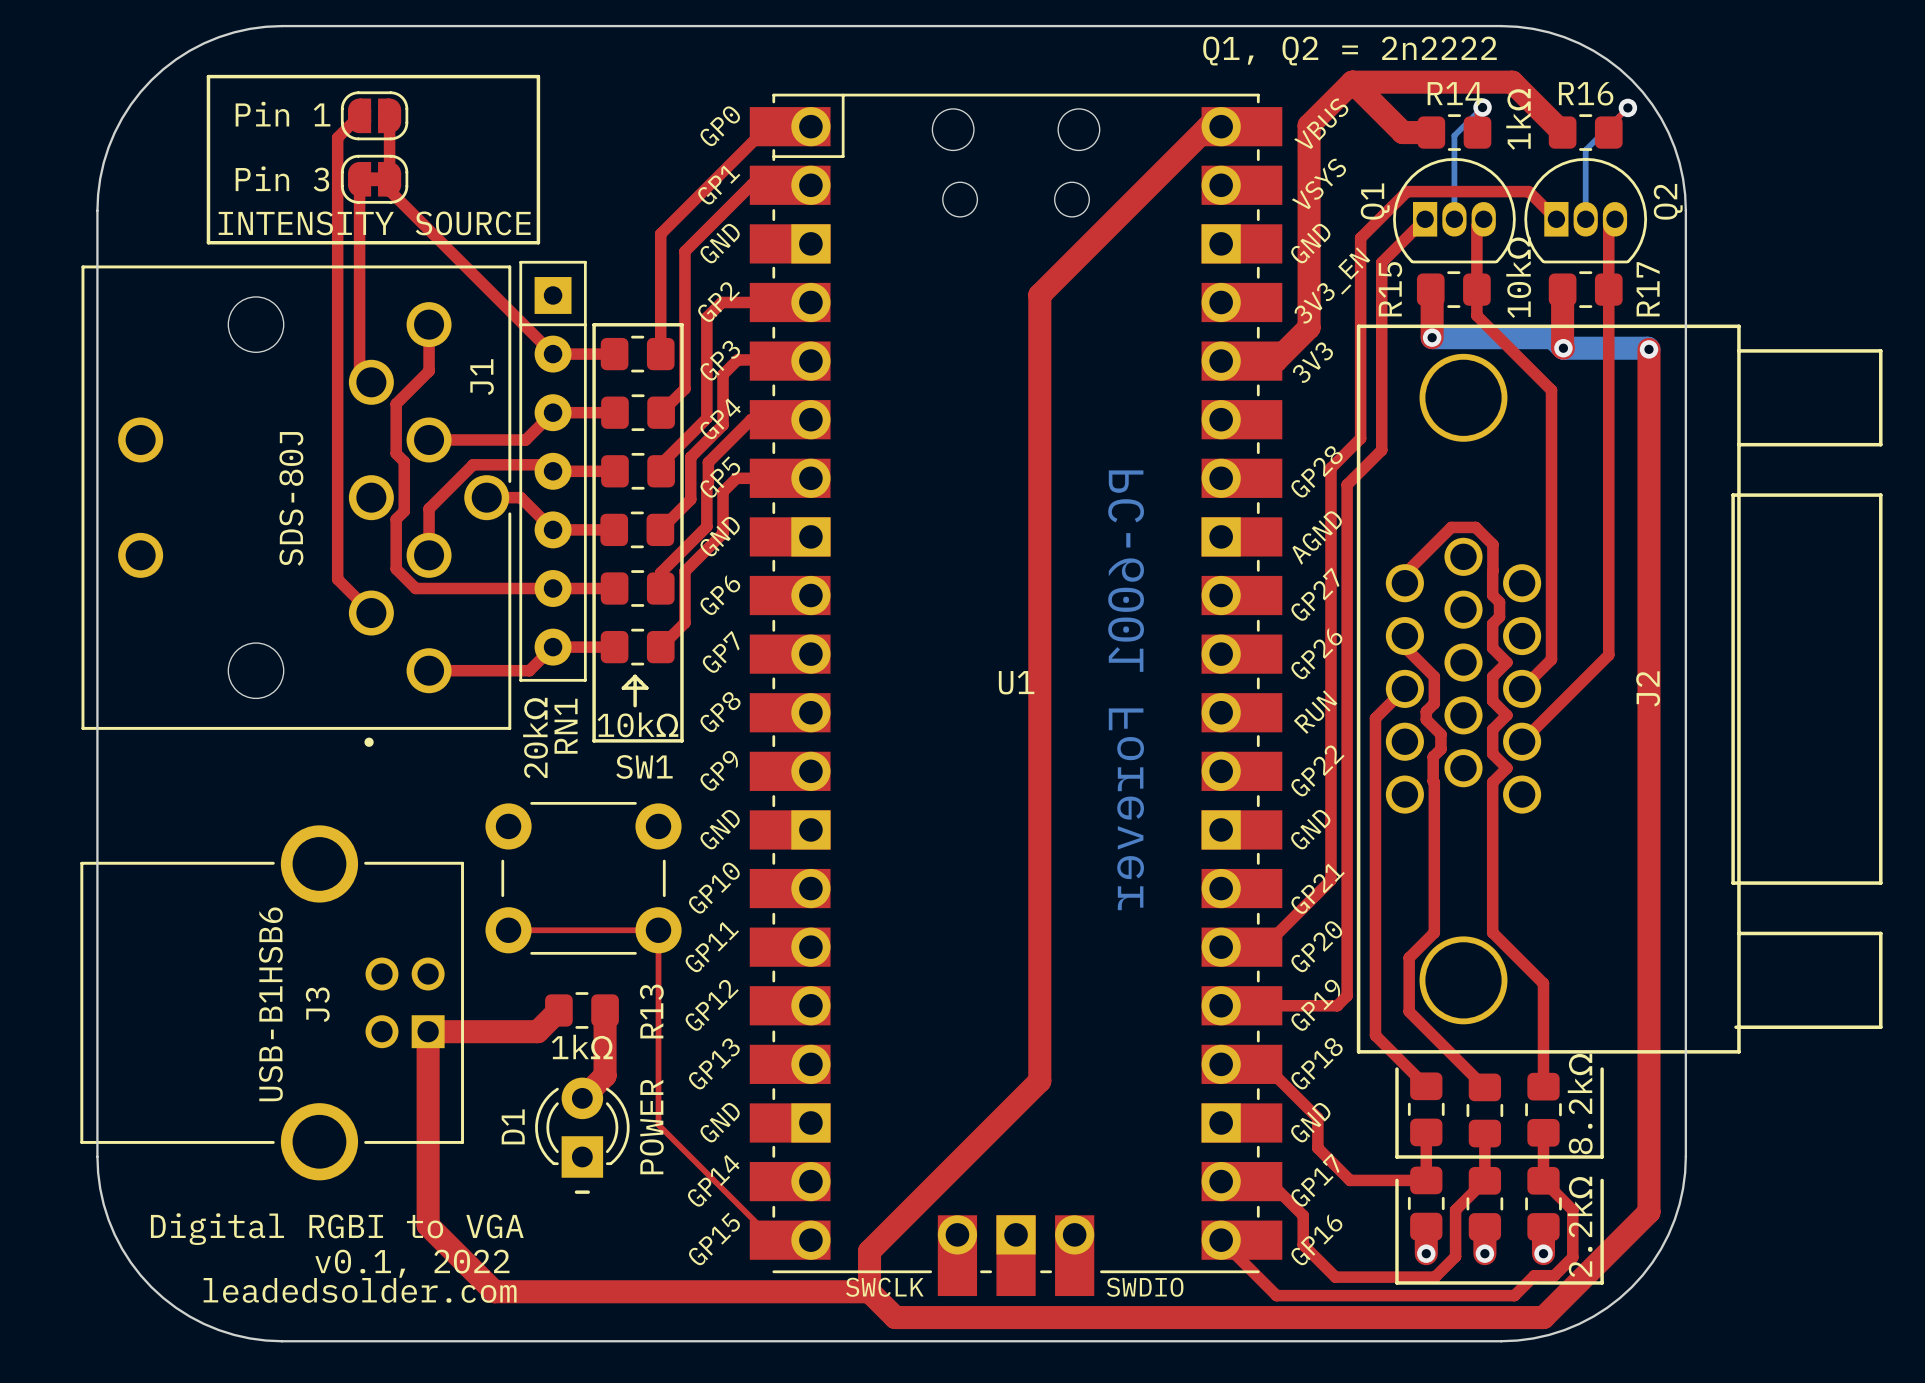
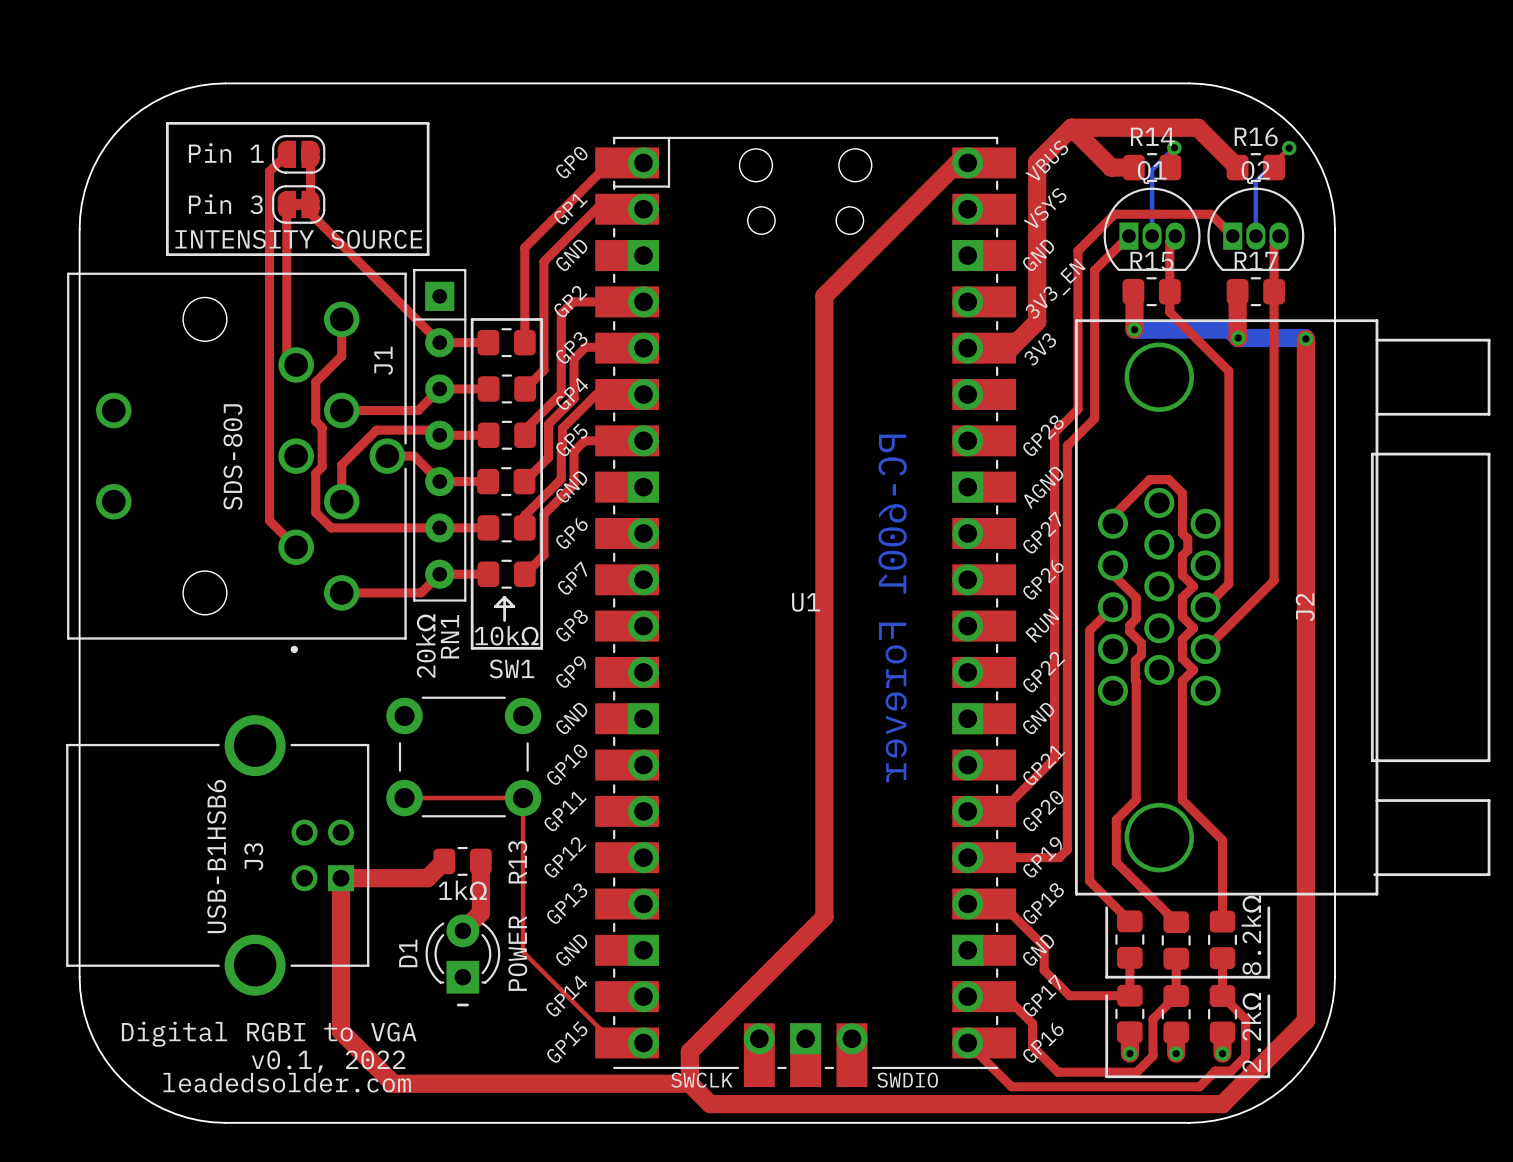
text: Q1, Q2 = 2n2222 (1349, 50) -> none
R16 value: 1kΩ (1518, 119) -> none
Q1 name rotation: 0° (1375, 201) -> 90° clockwise (1152, 172)
Q1 name position: Q1 (1375, 201) -> Q1 (1152, 172)
Q2 name rotation: 0° (1668, 201) -> 90° clockwise (1255, 172)
Q2 name position: Q2 (1668, 201) -> Q2 (1255, 172)
R15 value: 10kΩ (1518, 277) -> none
R15 name rotation: 0° (1390, 289) -> 90° clockwise (1151, 261)
R17 name rotation: 0° (1648, 289) -> 90° clockwise (1256, 260)

